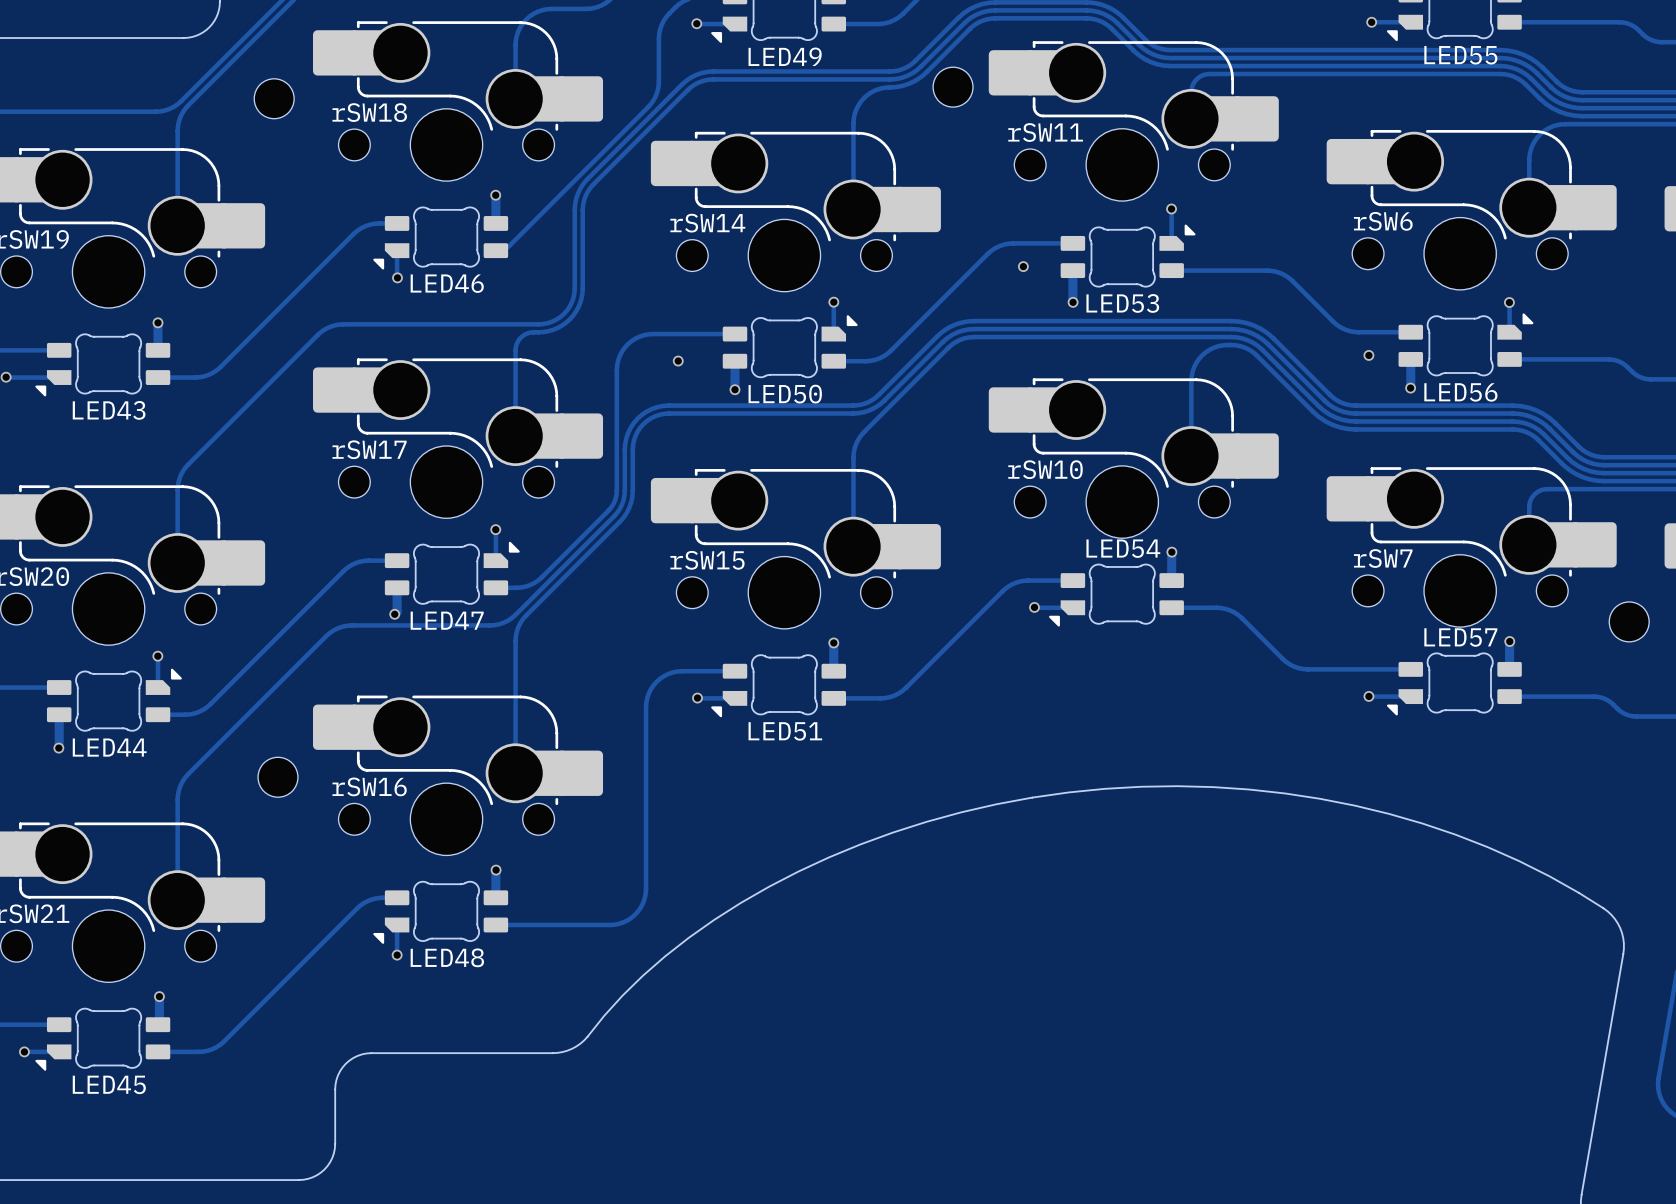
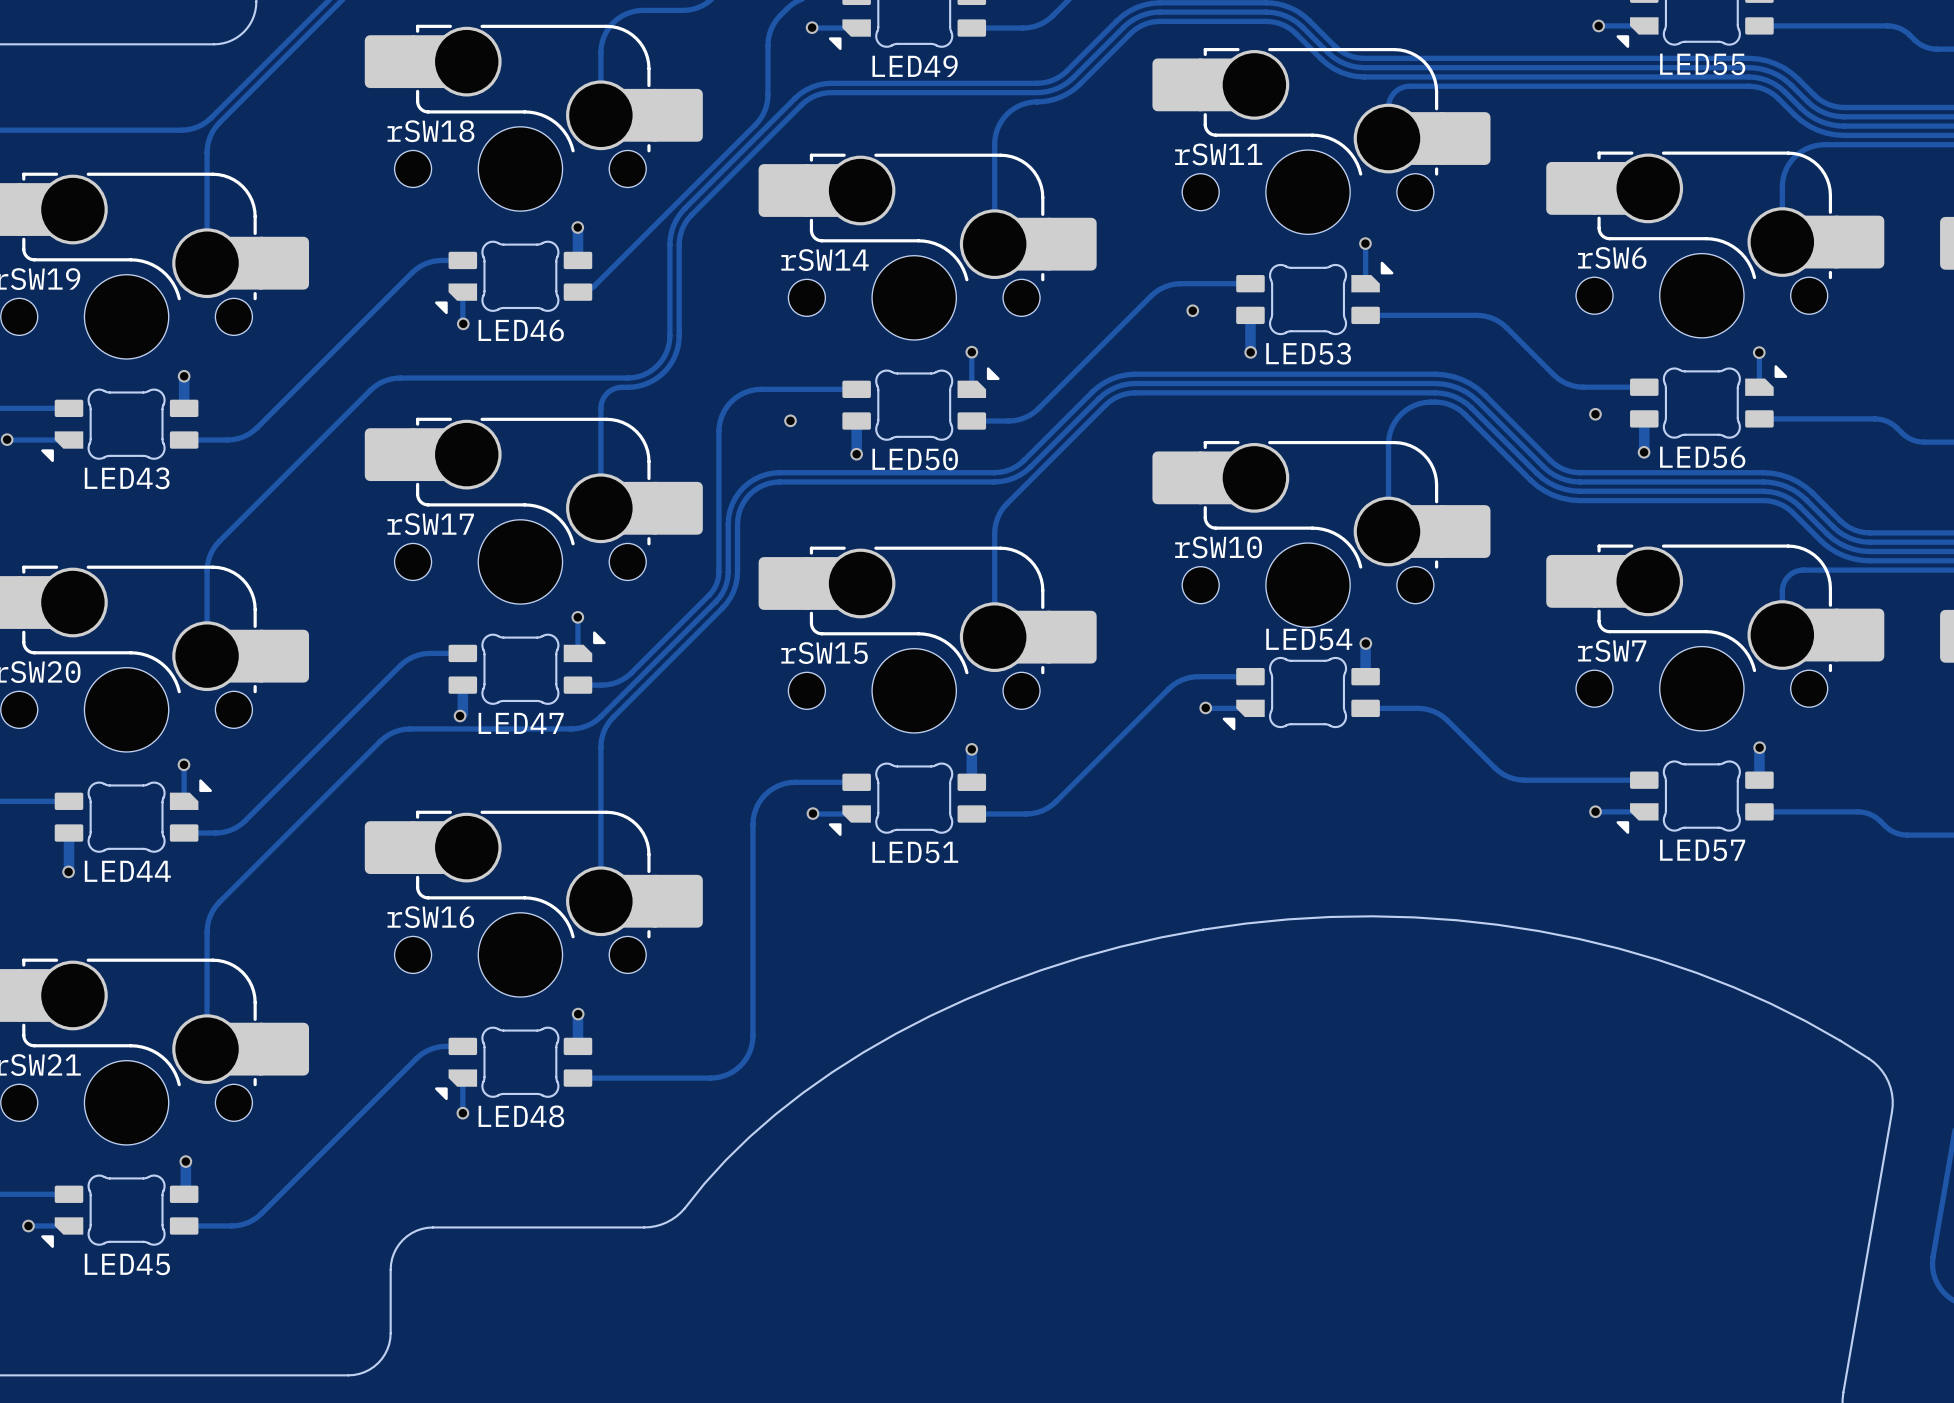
part: (953, 87) -> none
part: (274, 98) -> none
part: (1629, 621) -> none
LED57 name position: LED57 (1460, 637) -> LED57 (1702, 850)
part: (278, 777) -> none

